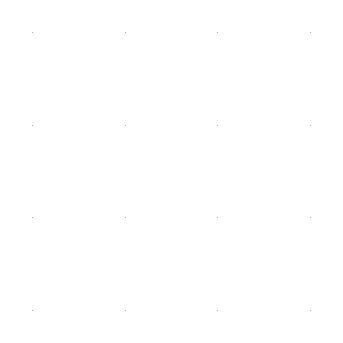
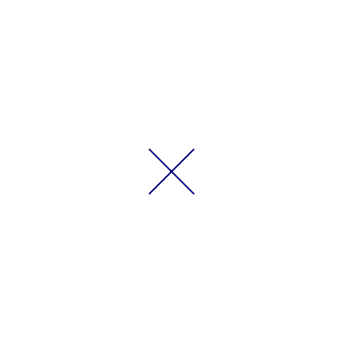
no-connect mark: none -> (171, 171)

